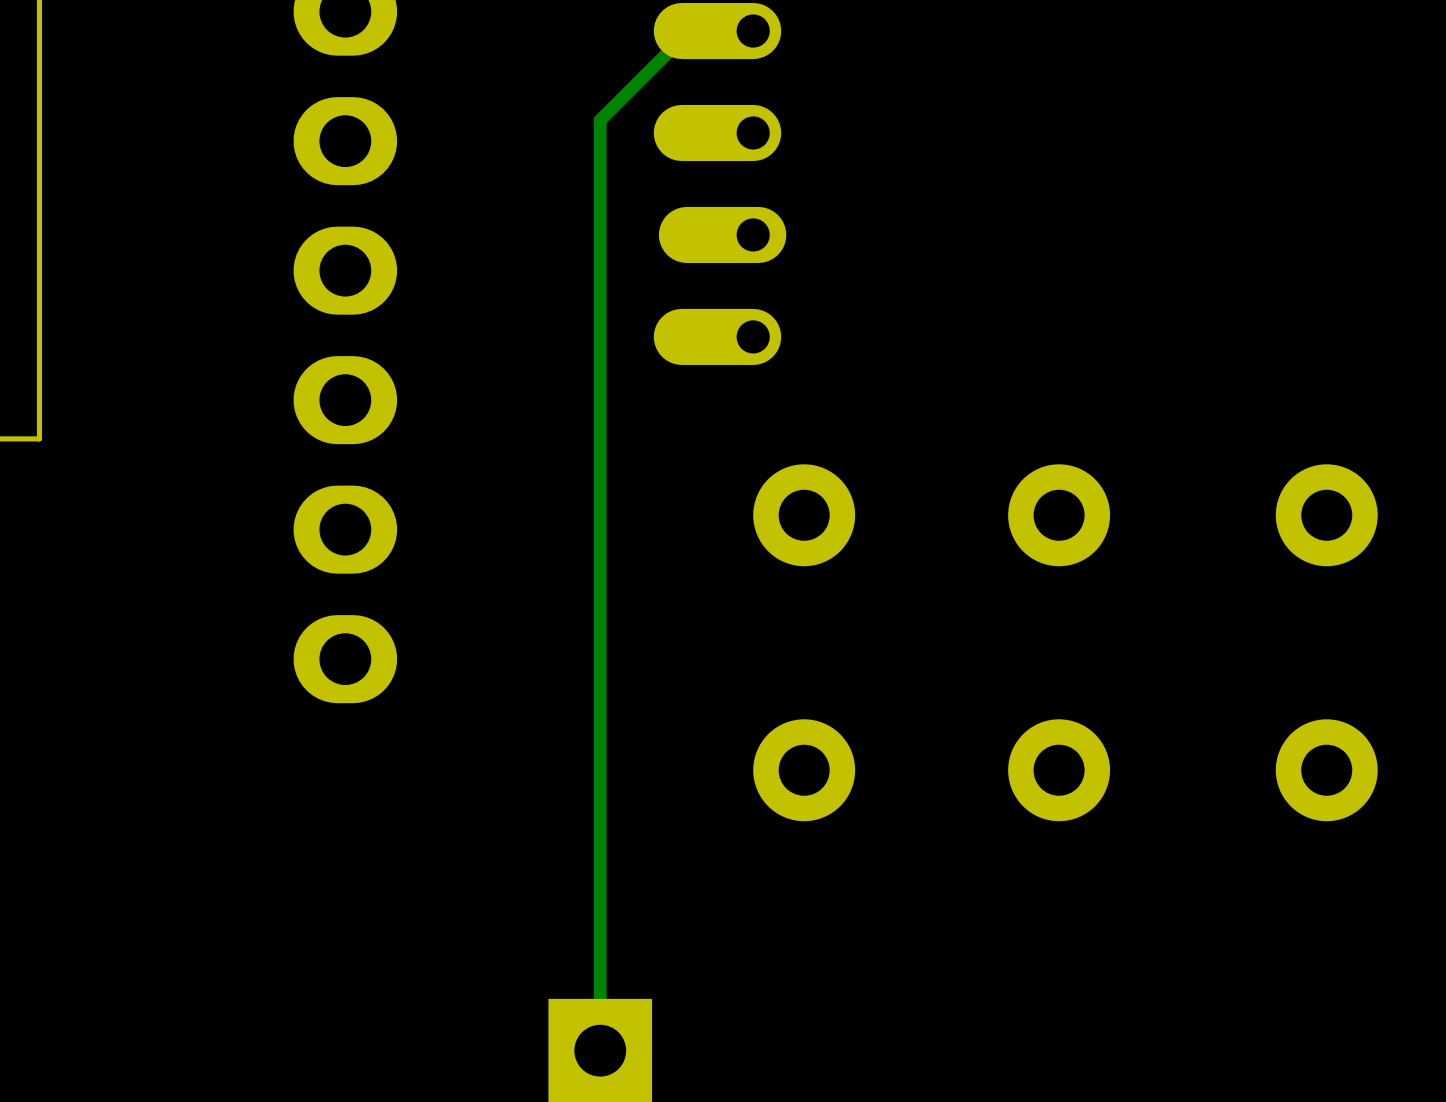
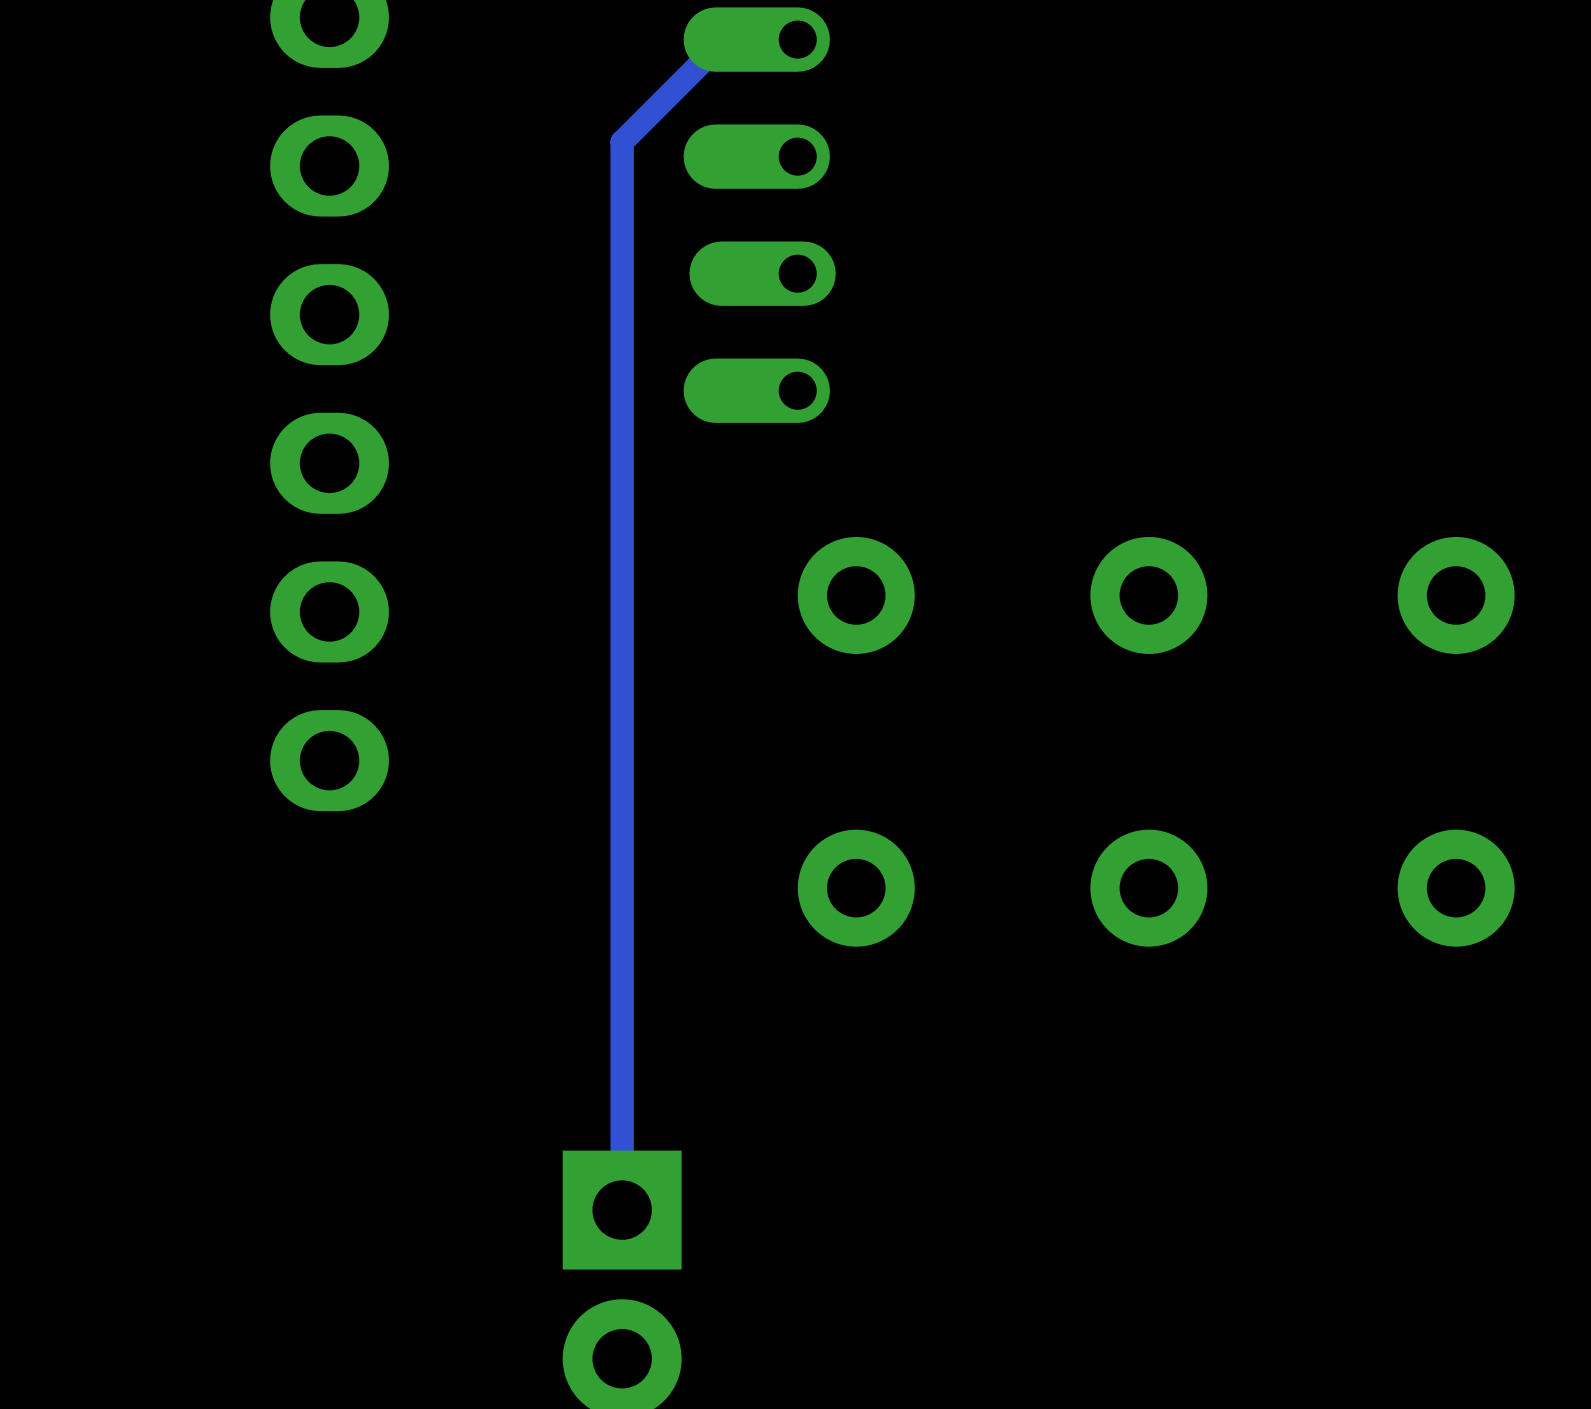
track width: thin (689, 31) (600, 120) (600, 1050) -> thick (724, 39) (622, 142) (622, 1210)

